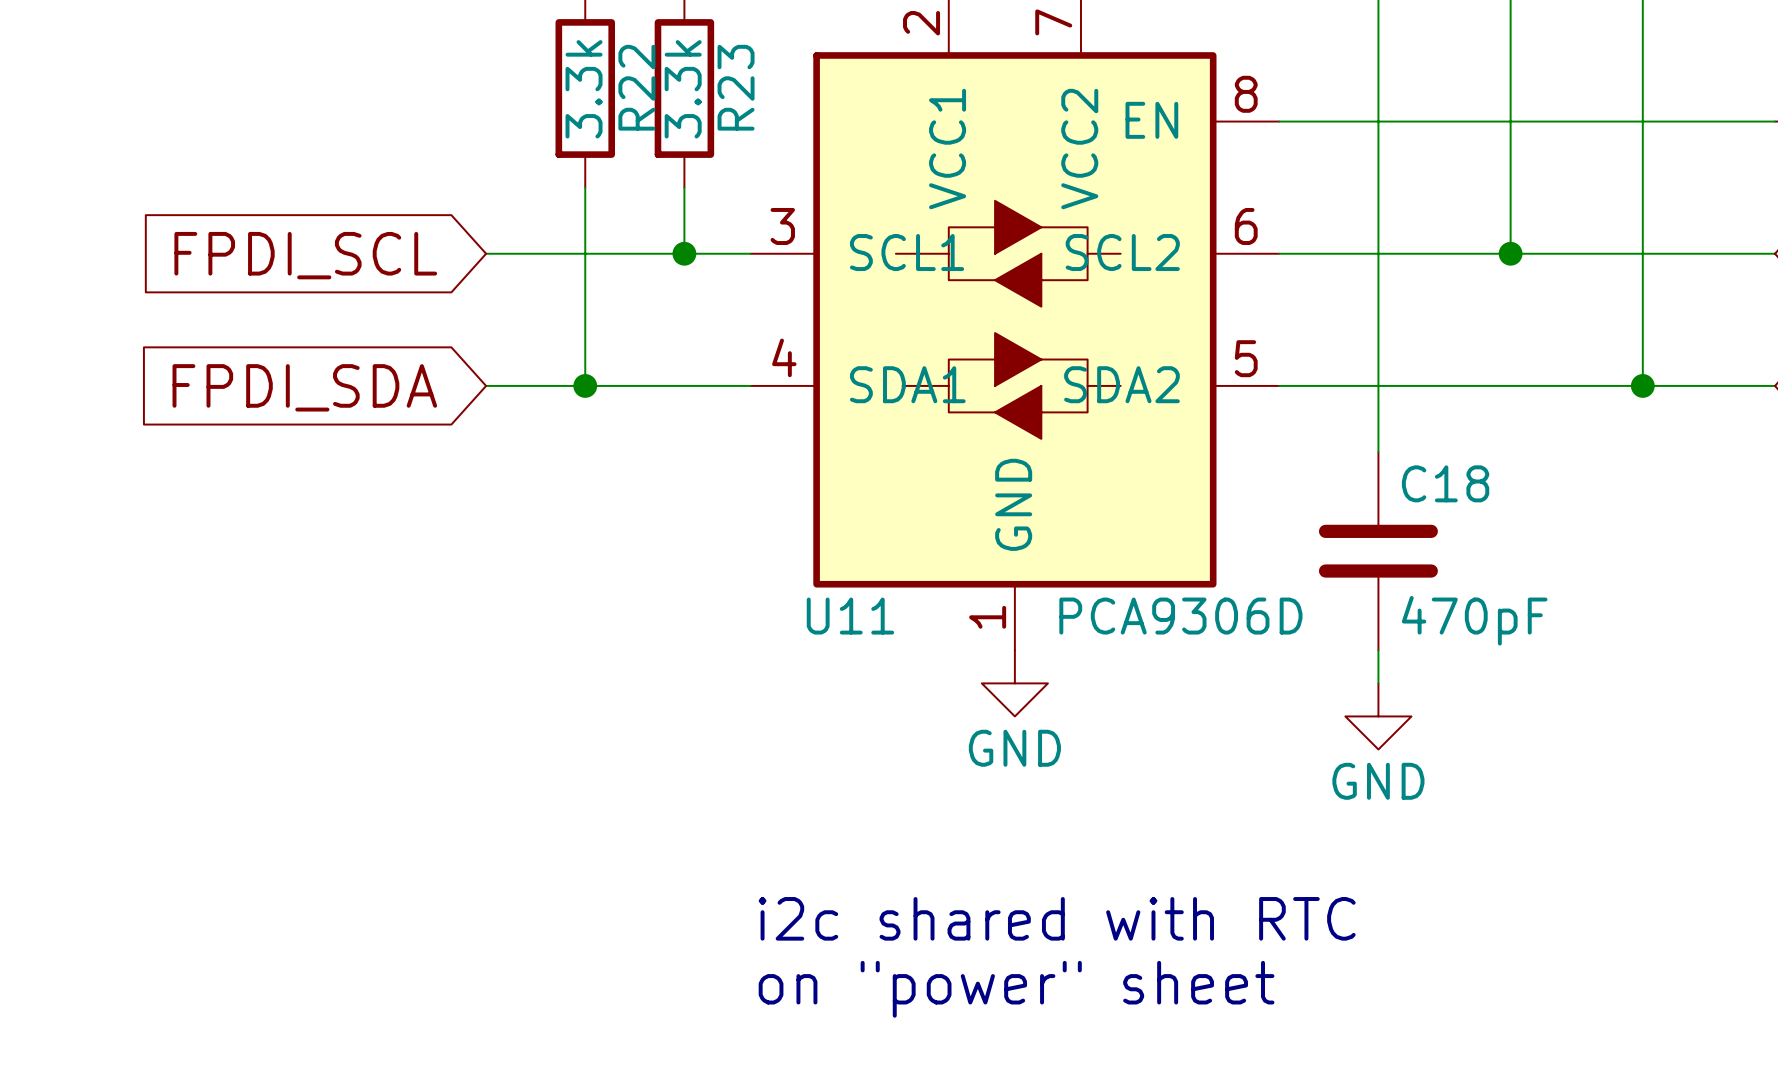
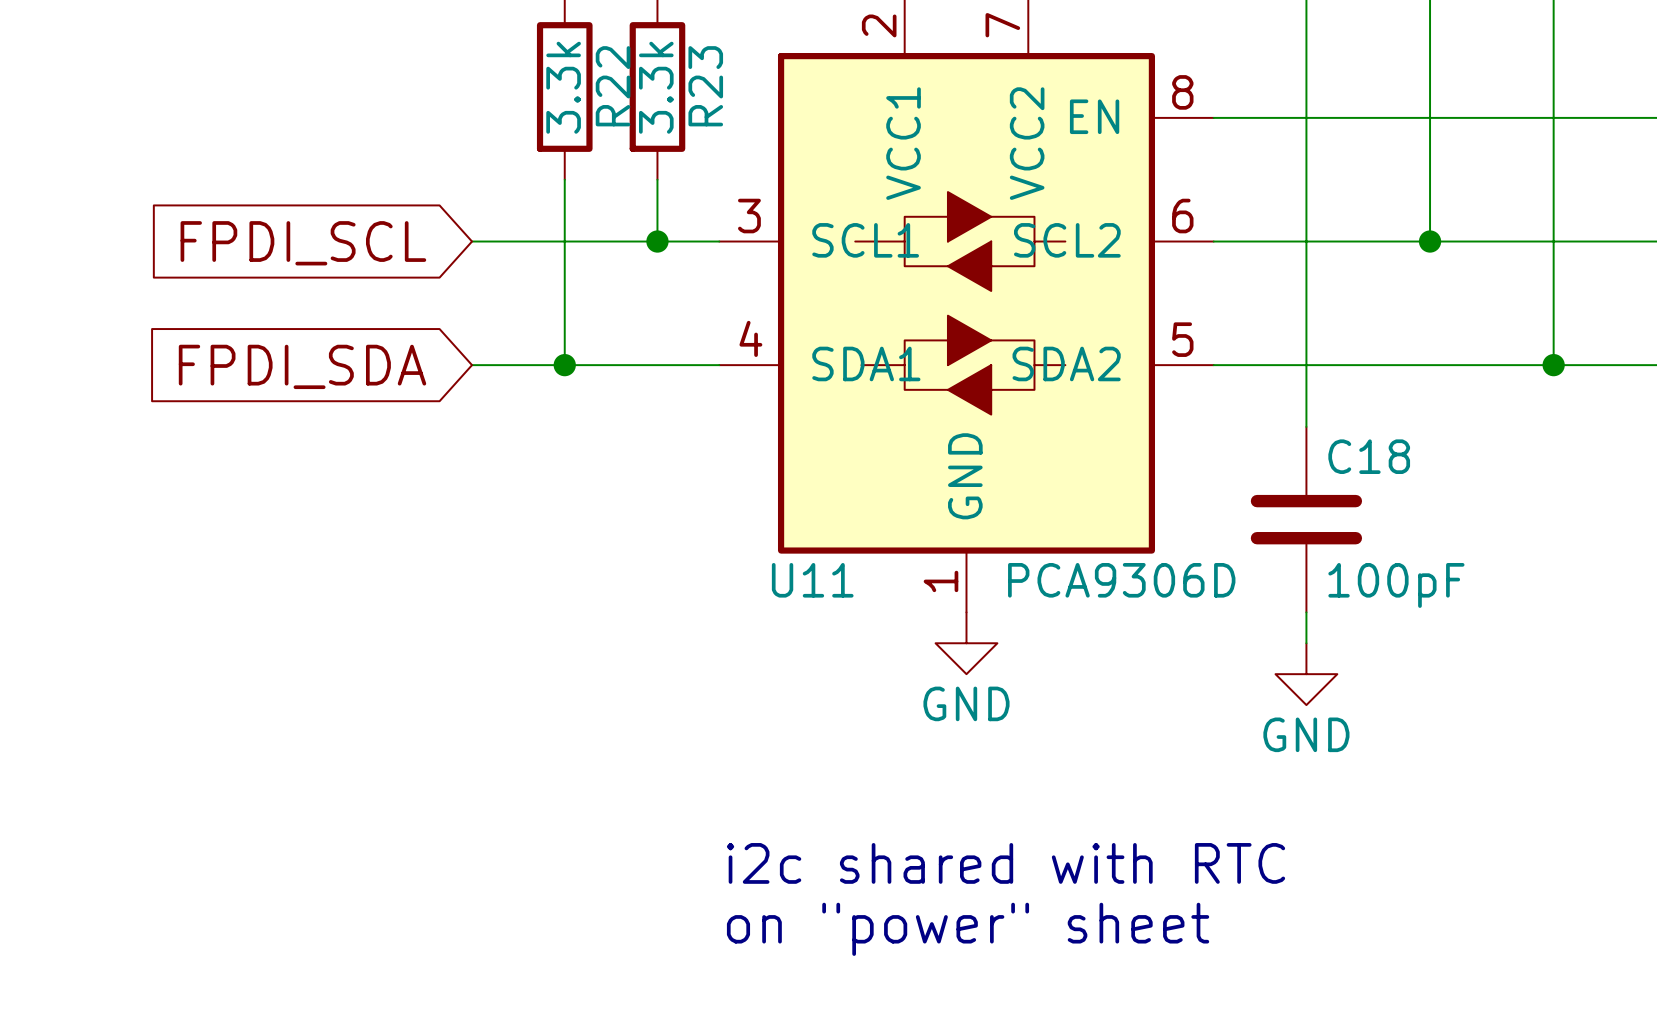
C18 value: 470pF (1474, 620) -> 100pF (1396, 585)

